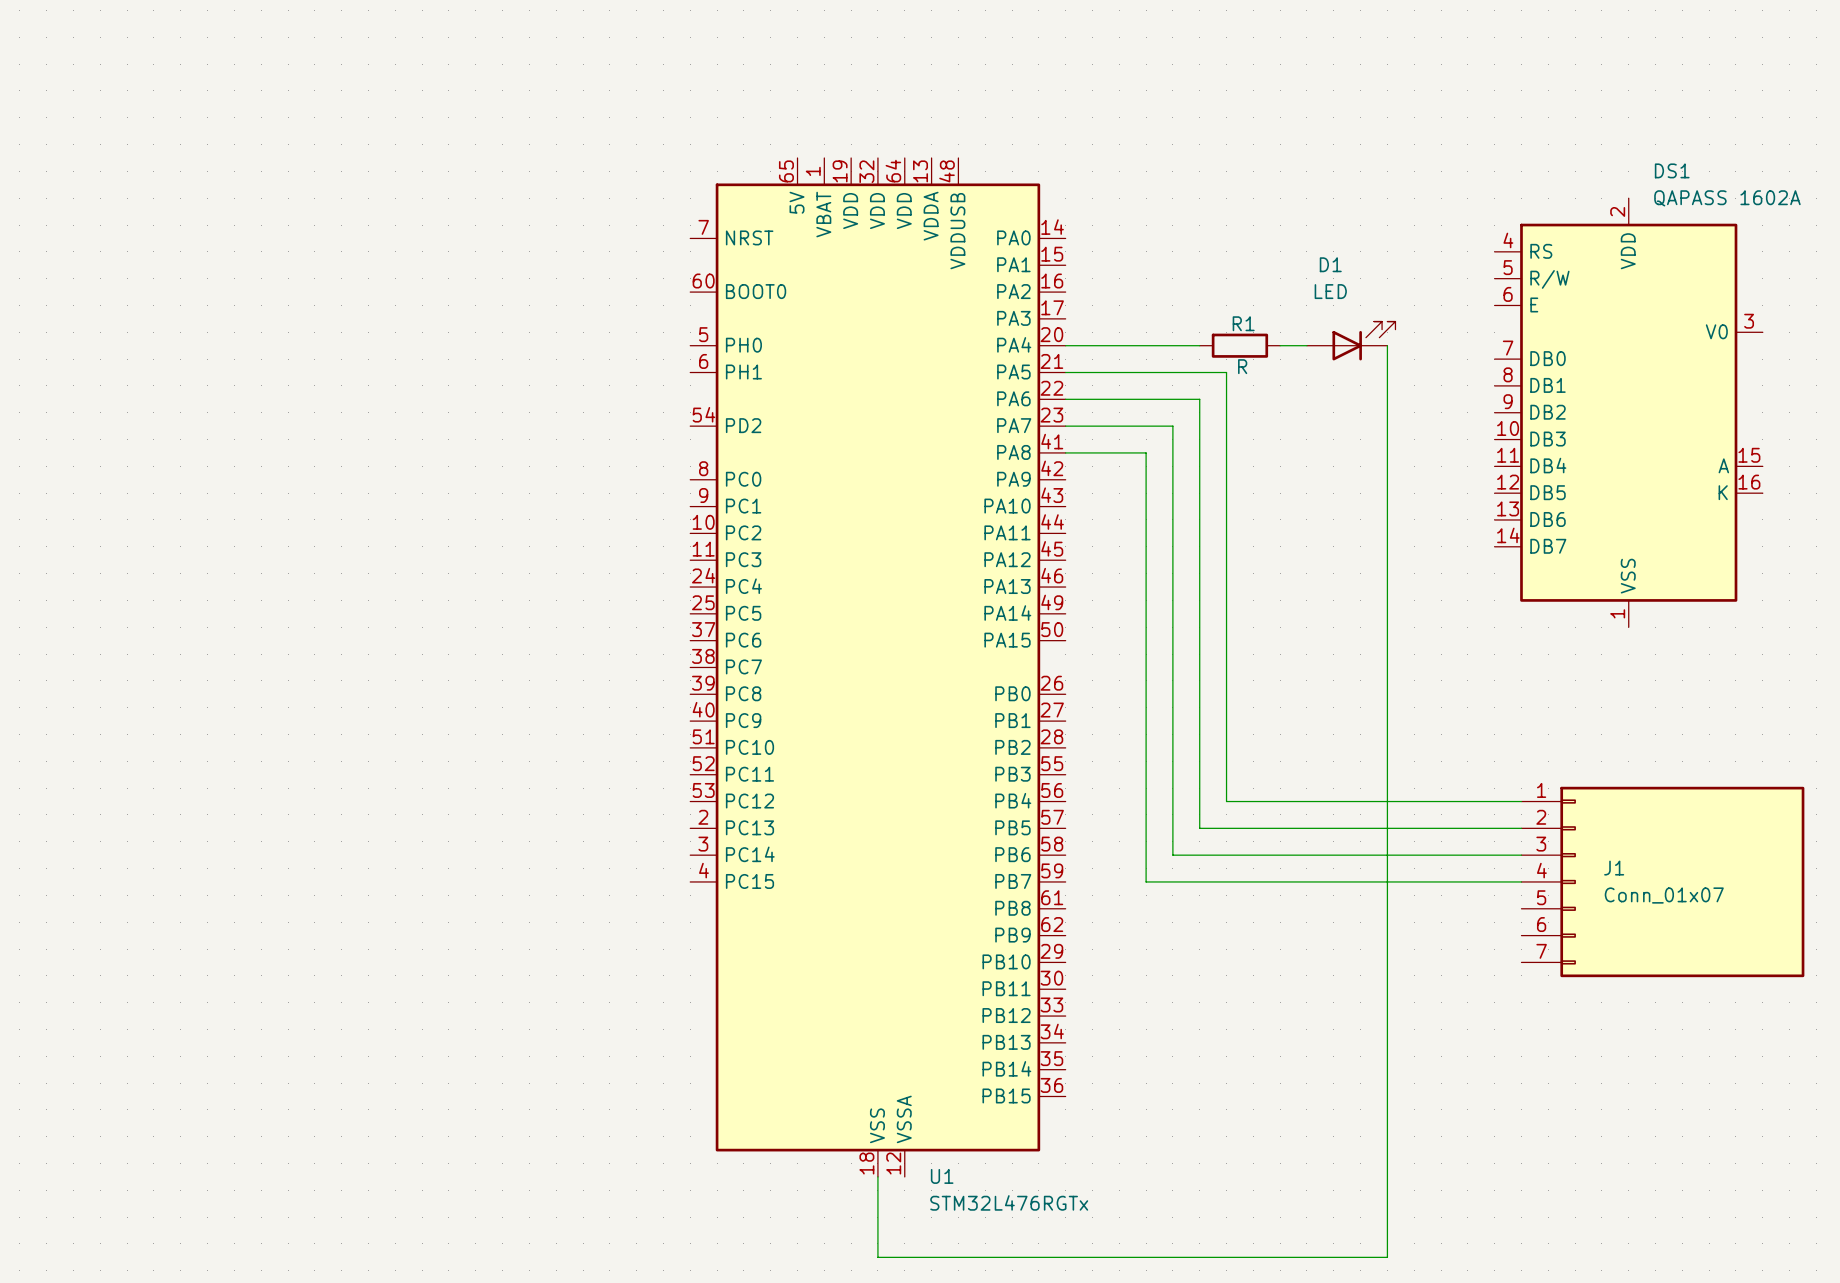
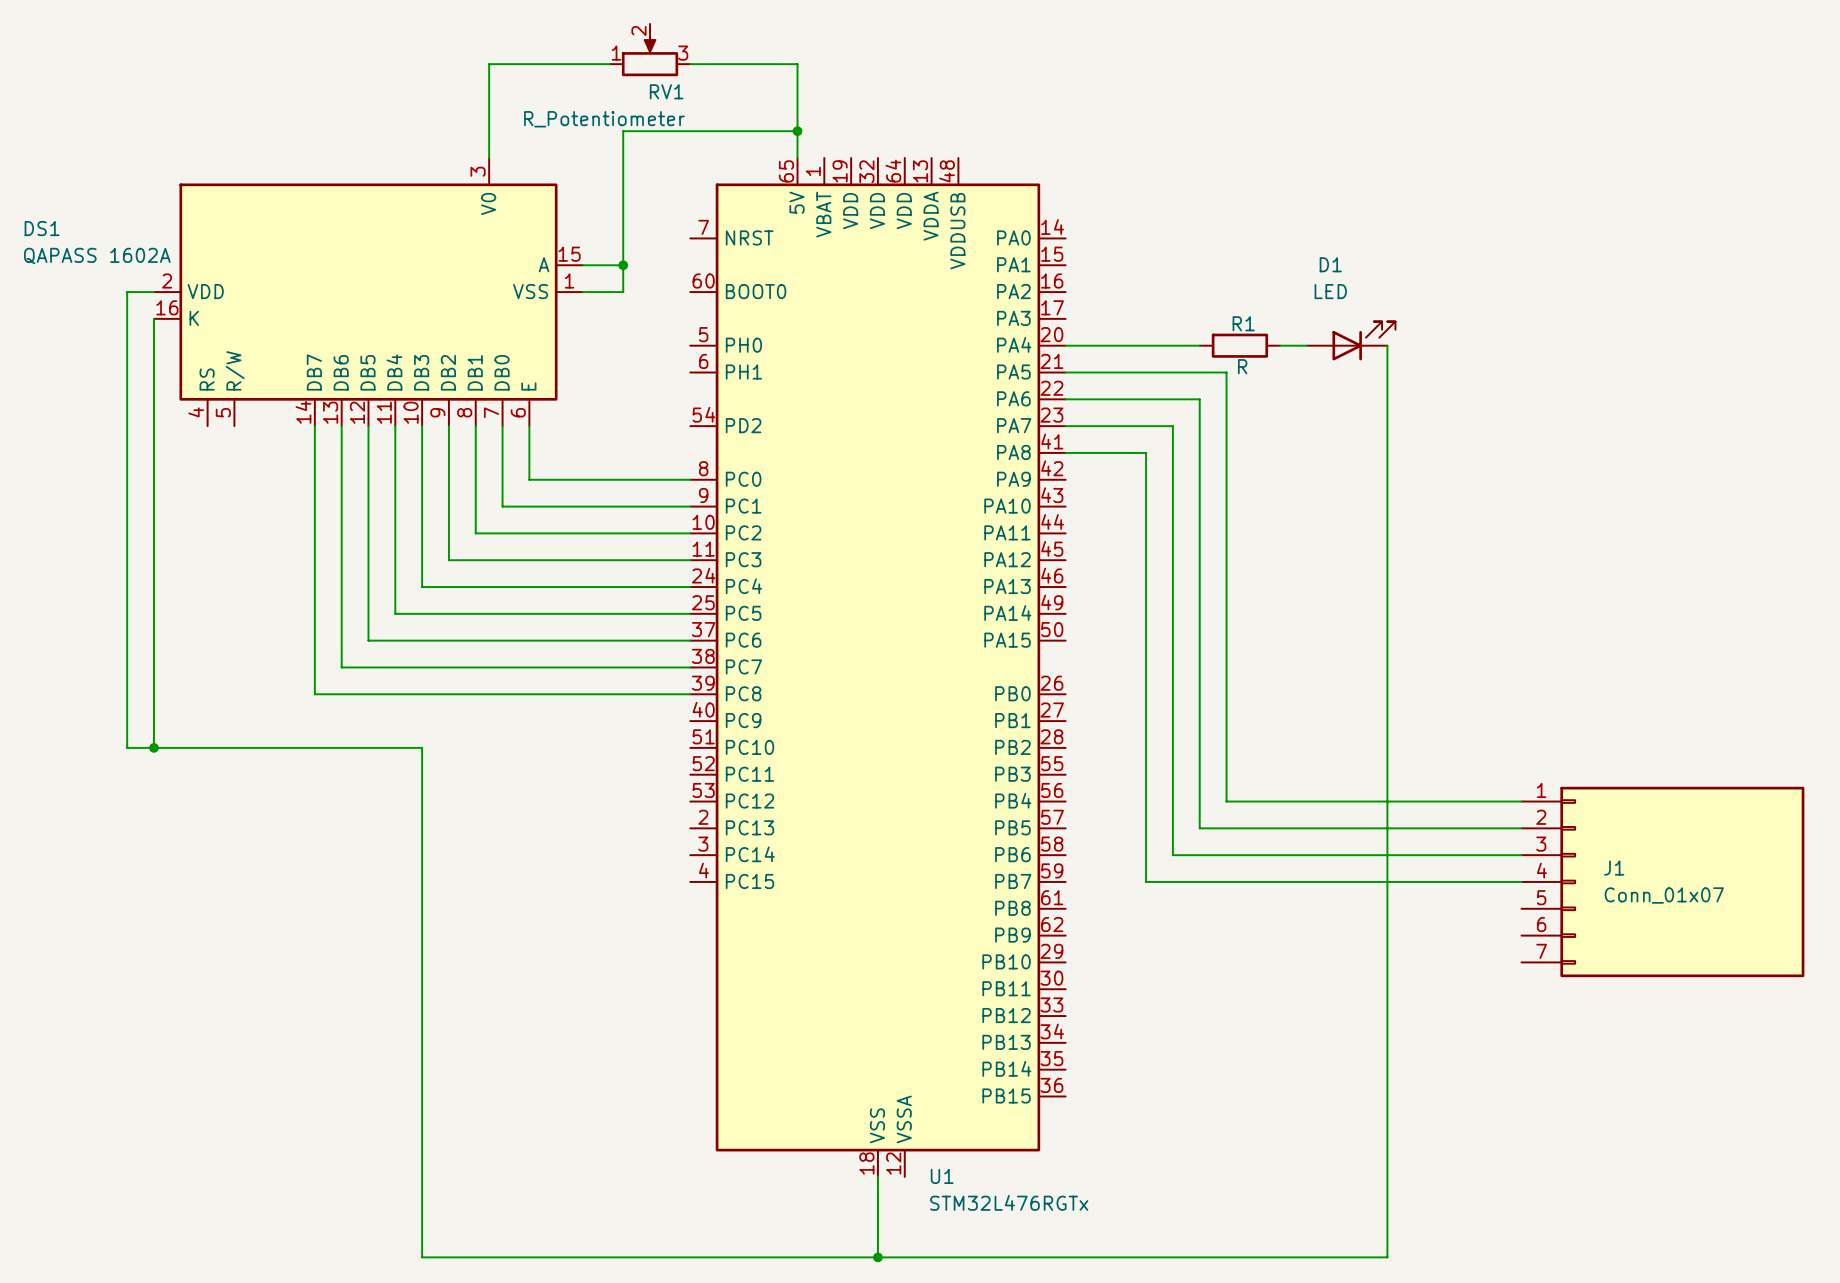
RV1: none -> R_Potentiometer (650, 50)
wire: none -> (609, 64) (489, 64) (489, 158)
wire: none -> (690, 64) (797, 64) (797, 158)
wire: none -> (797, 131) (623, 131) (623, 292) (583, 292)
junction: none -> (797, 131)
DS1 name position: DS1 (1672, 170) -> DS1 (42, 228)
DS1 symbol: [1494, 198, 1763, 628] -> [153, 158, 584, 427]
DS1 value position: QAPASS 1602A (1727, 198) -> QAPASS 1602A (97, 256)
wire: none -> (583, 265) (623, 265)
junction: none -> (623, 265)
wire: none -> (153, 292) (127, 292) (127, 747) (422, 747) (422, 1257) (877, 1257)
wire: none -> (153, 318) (153, 747)
wire: none -> (314, 426) (314, 694) (690, 694)
wire: none -> (341, 426) (341, 667) (690, 667)
wire: none -> (368, 426) (368, 640) (690, 640)
wire: none -> (395, 426) (395, 613) (690, 613)
wire: none -> (422, 426) (422, 587) (690, 587)
wire: none -> (448, 426) (448, 560) (690, 560)
wire: none -> (475, 426) (475, 533) (690, 533)
wire: none -> (502, 426) (502, 506) (690, 506)
wire: none -> (529, 426) (529, 479) (690, 479)
junction: none -> (153, 747)
junction: none -> (877, 1257)

